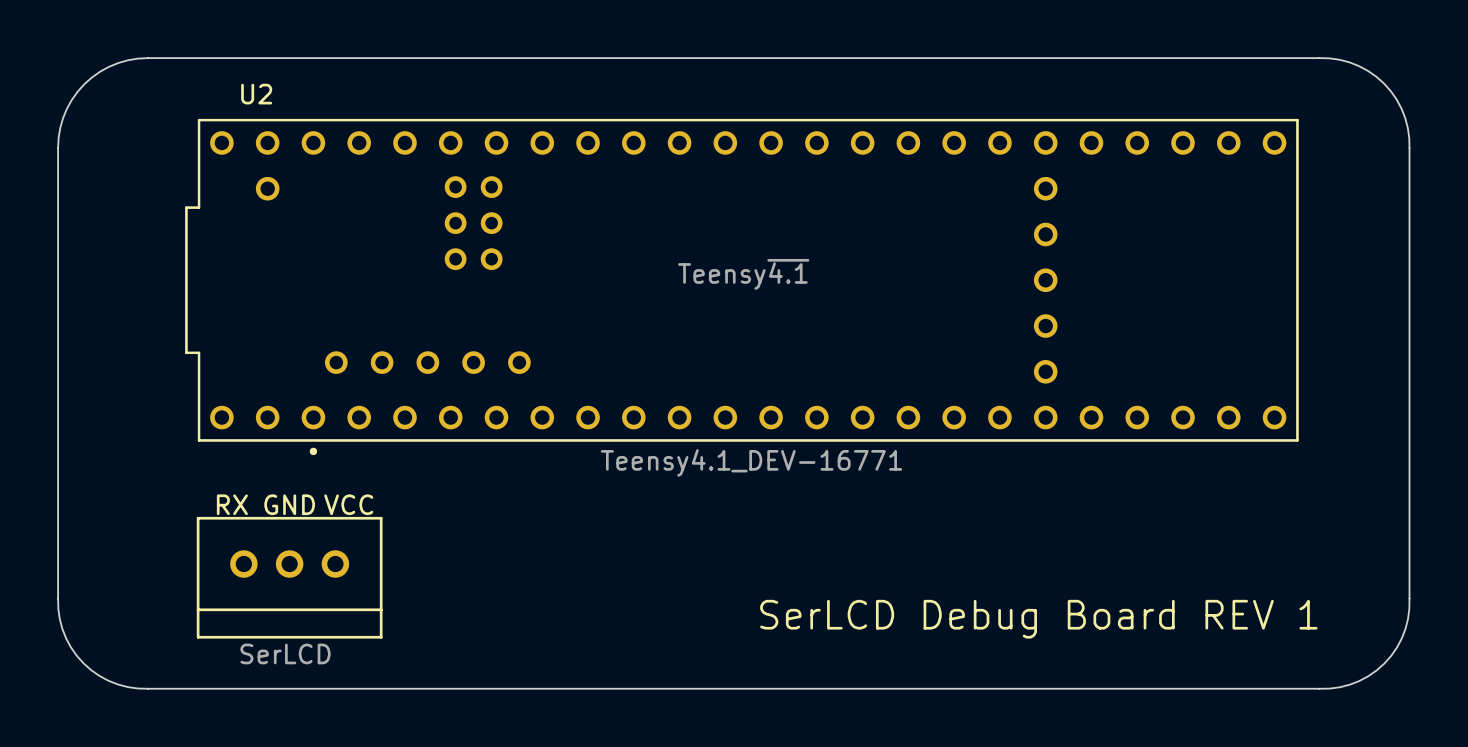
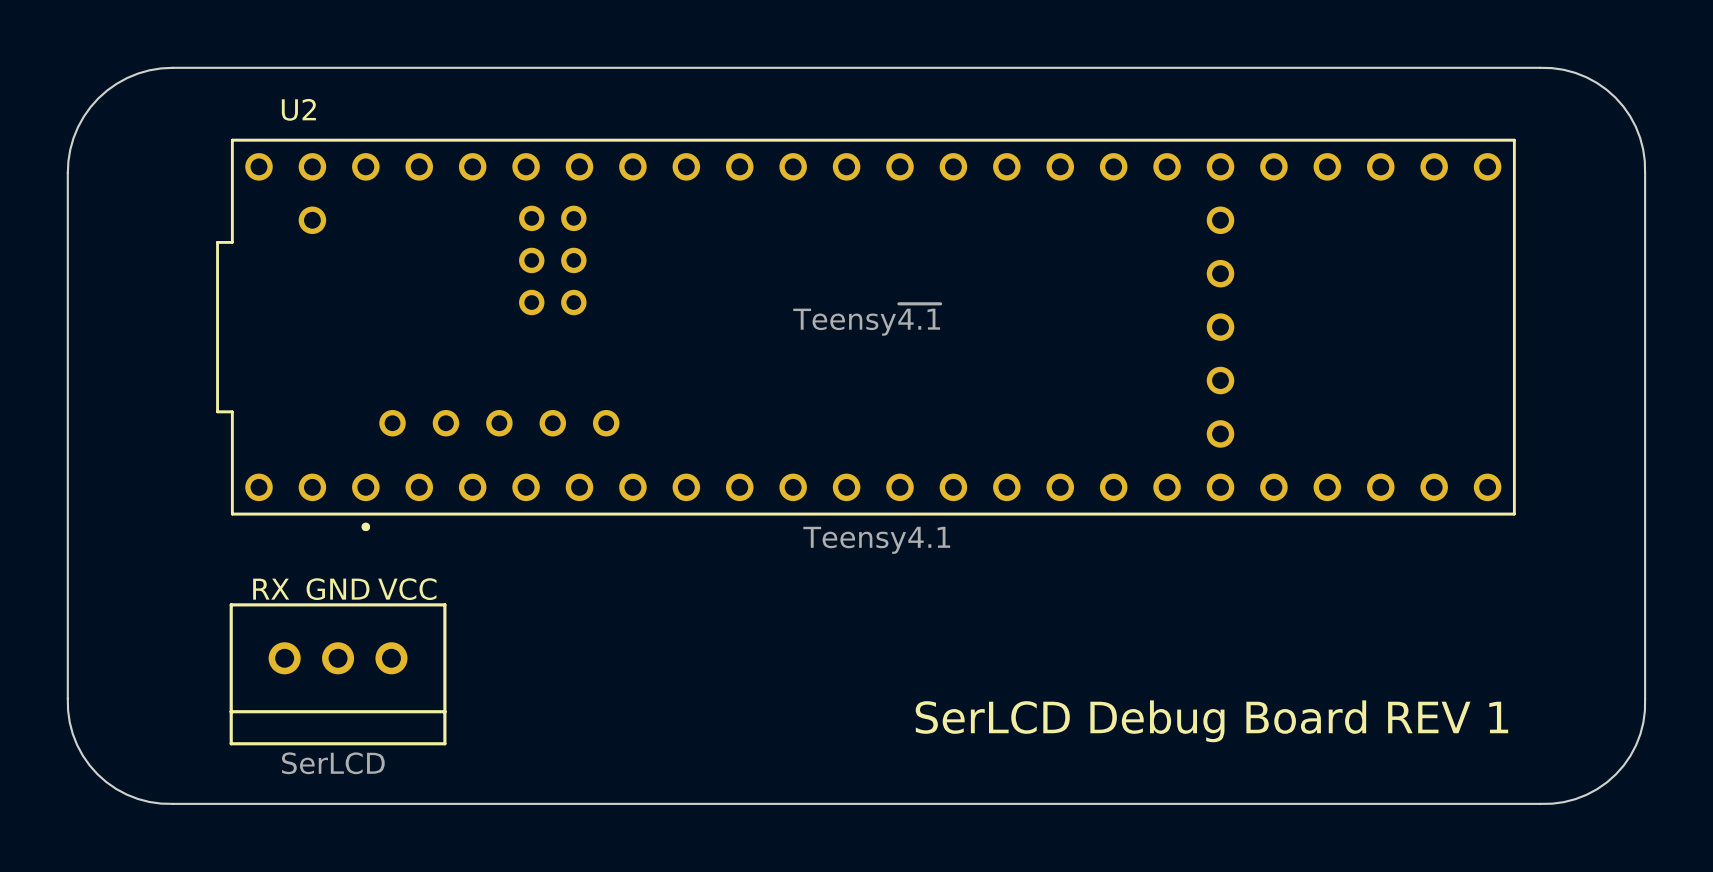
U2 value: Teensy4.1_DEV-16771 (751, 462) -> Teensy4.1 (876, 540)

